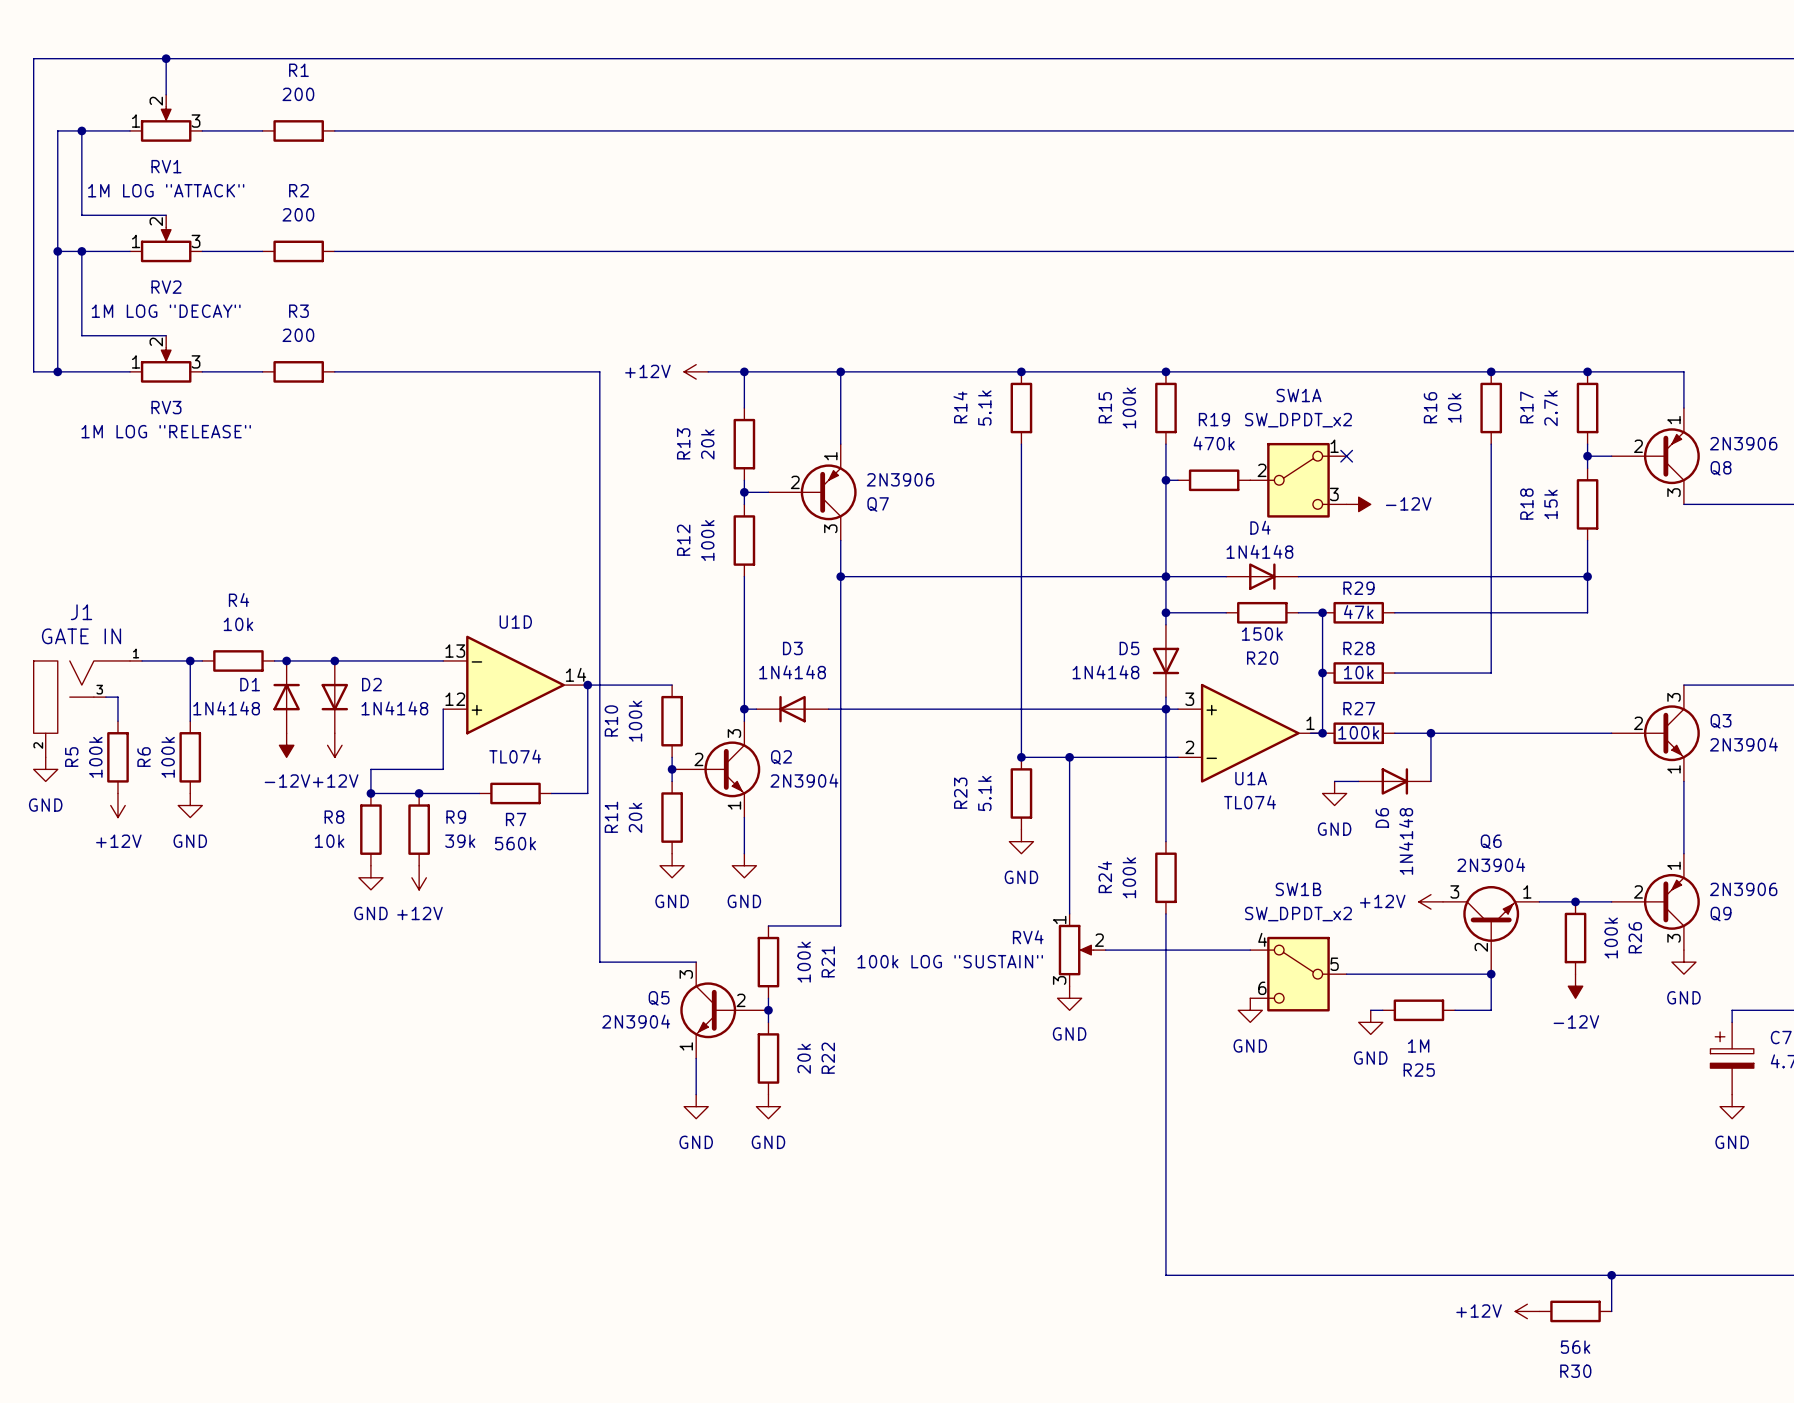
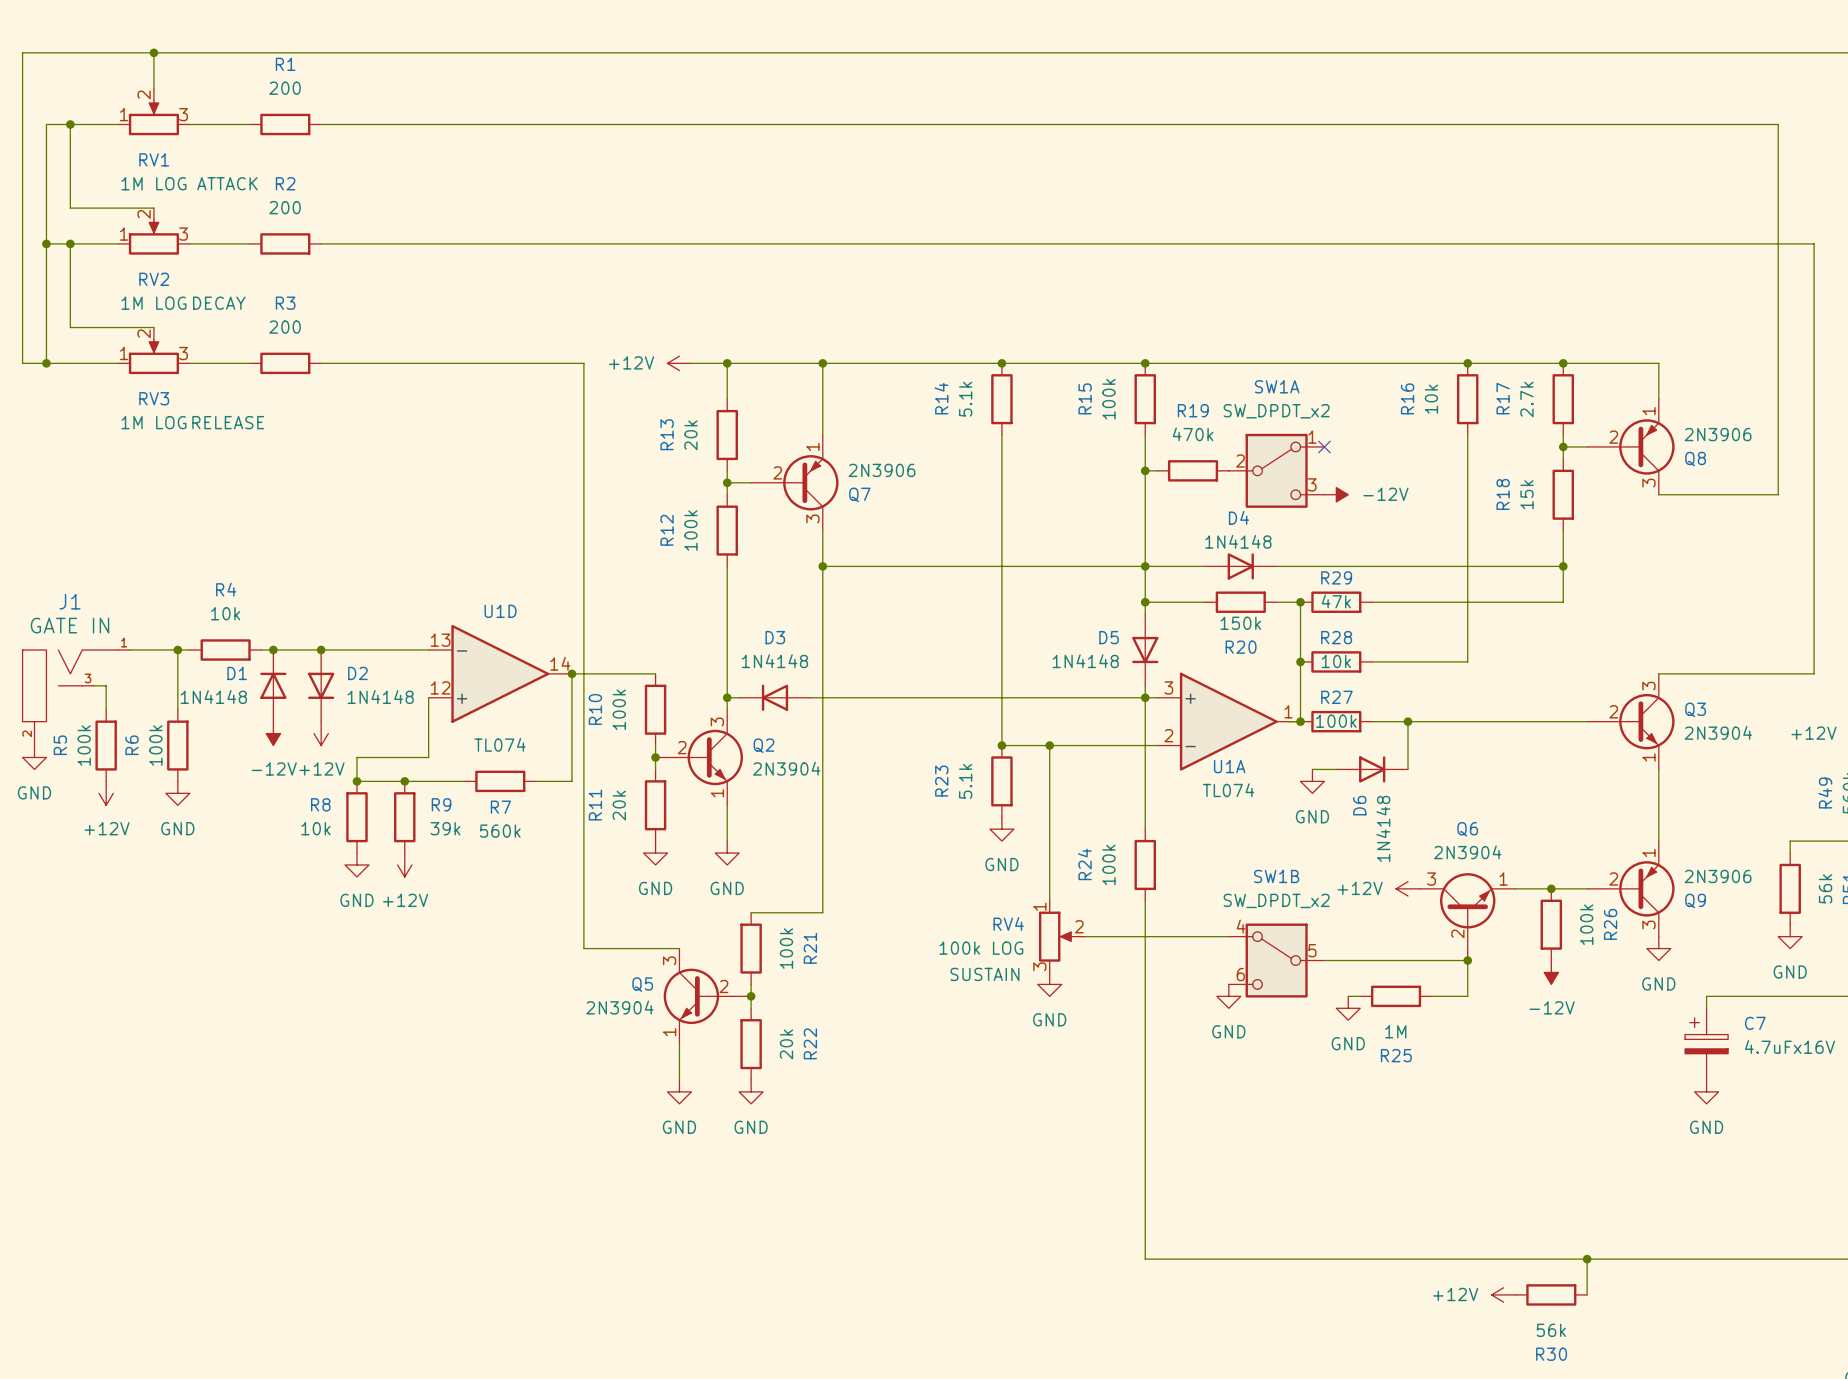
RV1 value: 1M LOG "ATTACK" (166, 190) -> 1M LOG (153, 183)
RV1 text: none -> ATTACK (227, 183)
RV2 value: 1M LOG "DECAY" (166, 311) -> 1M LOG (153, 303)
RV2 text: none -> DECAY (219, 303)
RV3 value: 1M LOG "RELEASE" (166, 431) -> 1M LOG (153, 422)
RV3 text: none -> RELEASE (228, 422)
RV4 value: 100k LOG "SUSTAIN" (950, 961) -> 100k LOG (981, 948)
RV4 text: none -> SUSTAIN (984, 974)

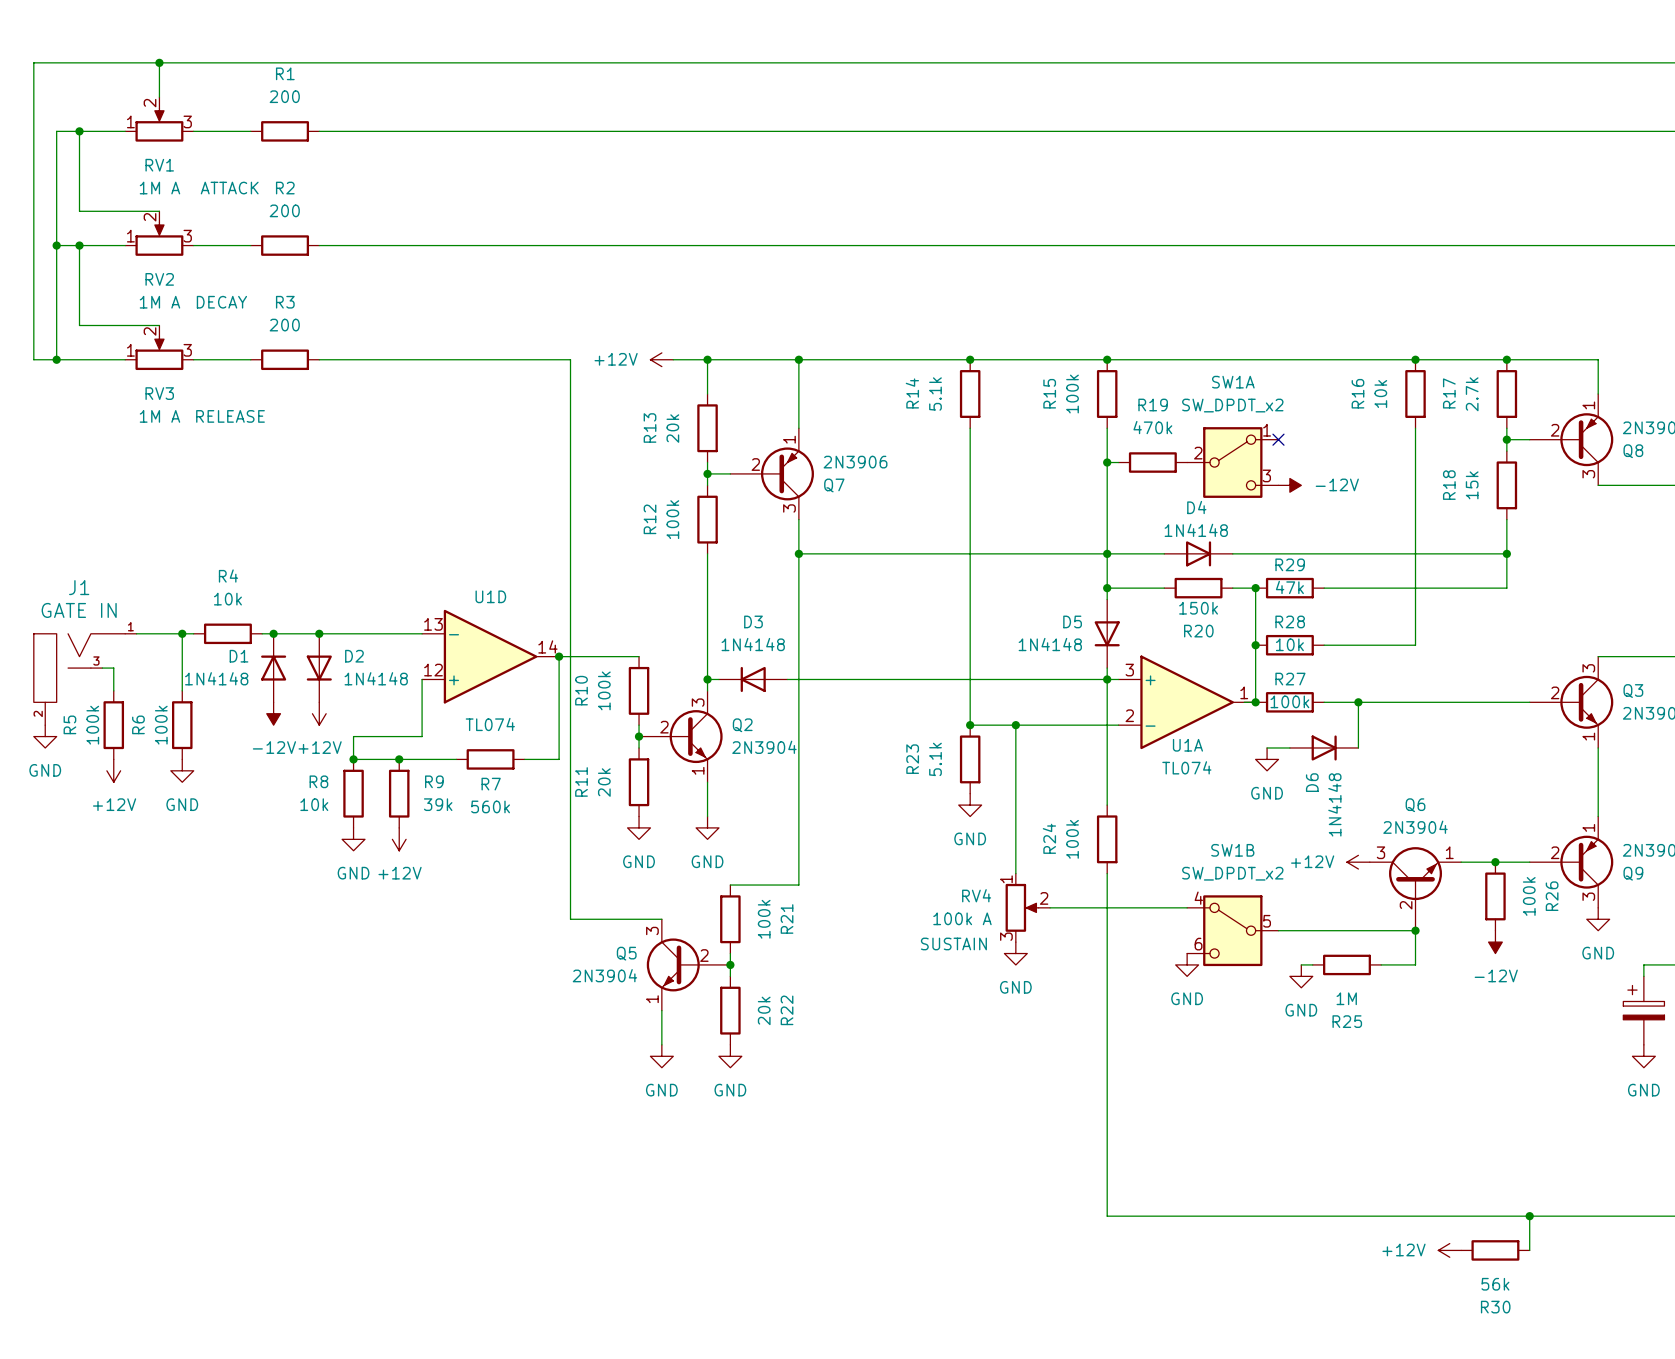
RV1 value: 1M LOG (153, 183) -> 1M A (159, 188)
RV2 value: 1M LOG (153, 303) -> 1M A (159, 302)
RV3 value: 1M LOG (153, 422) -> 1M A (159, 416)
RV4 value: 100k LOG (981, 948) -> 100k A (962, 918)

